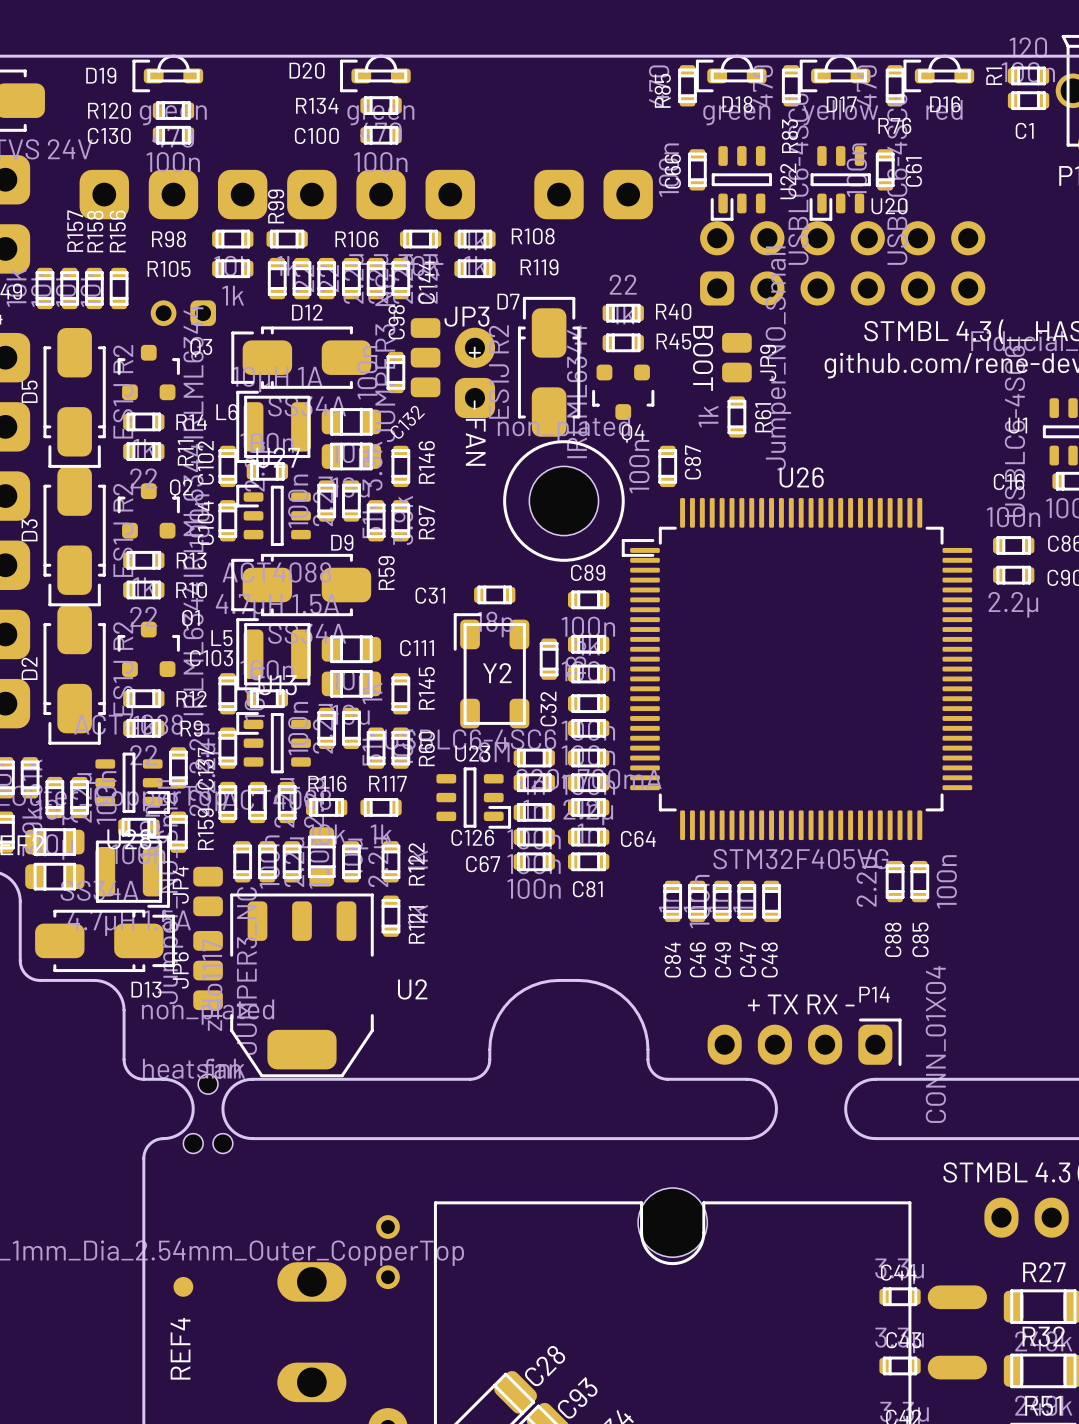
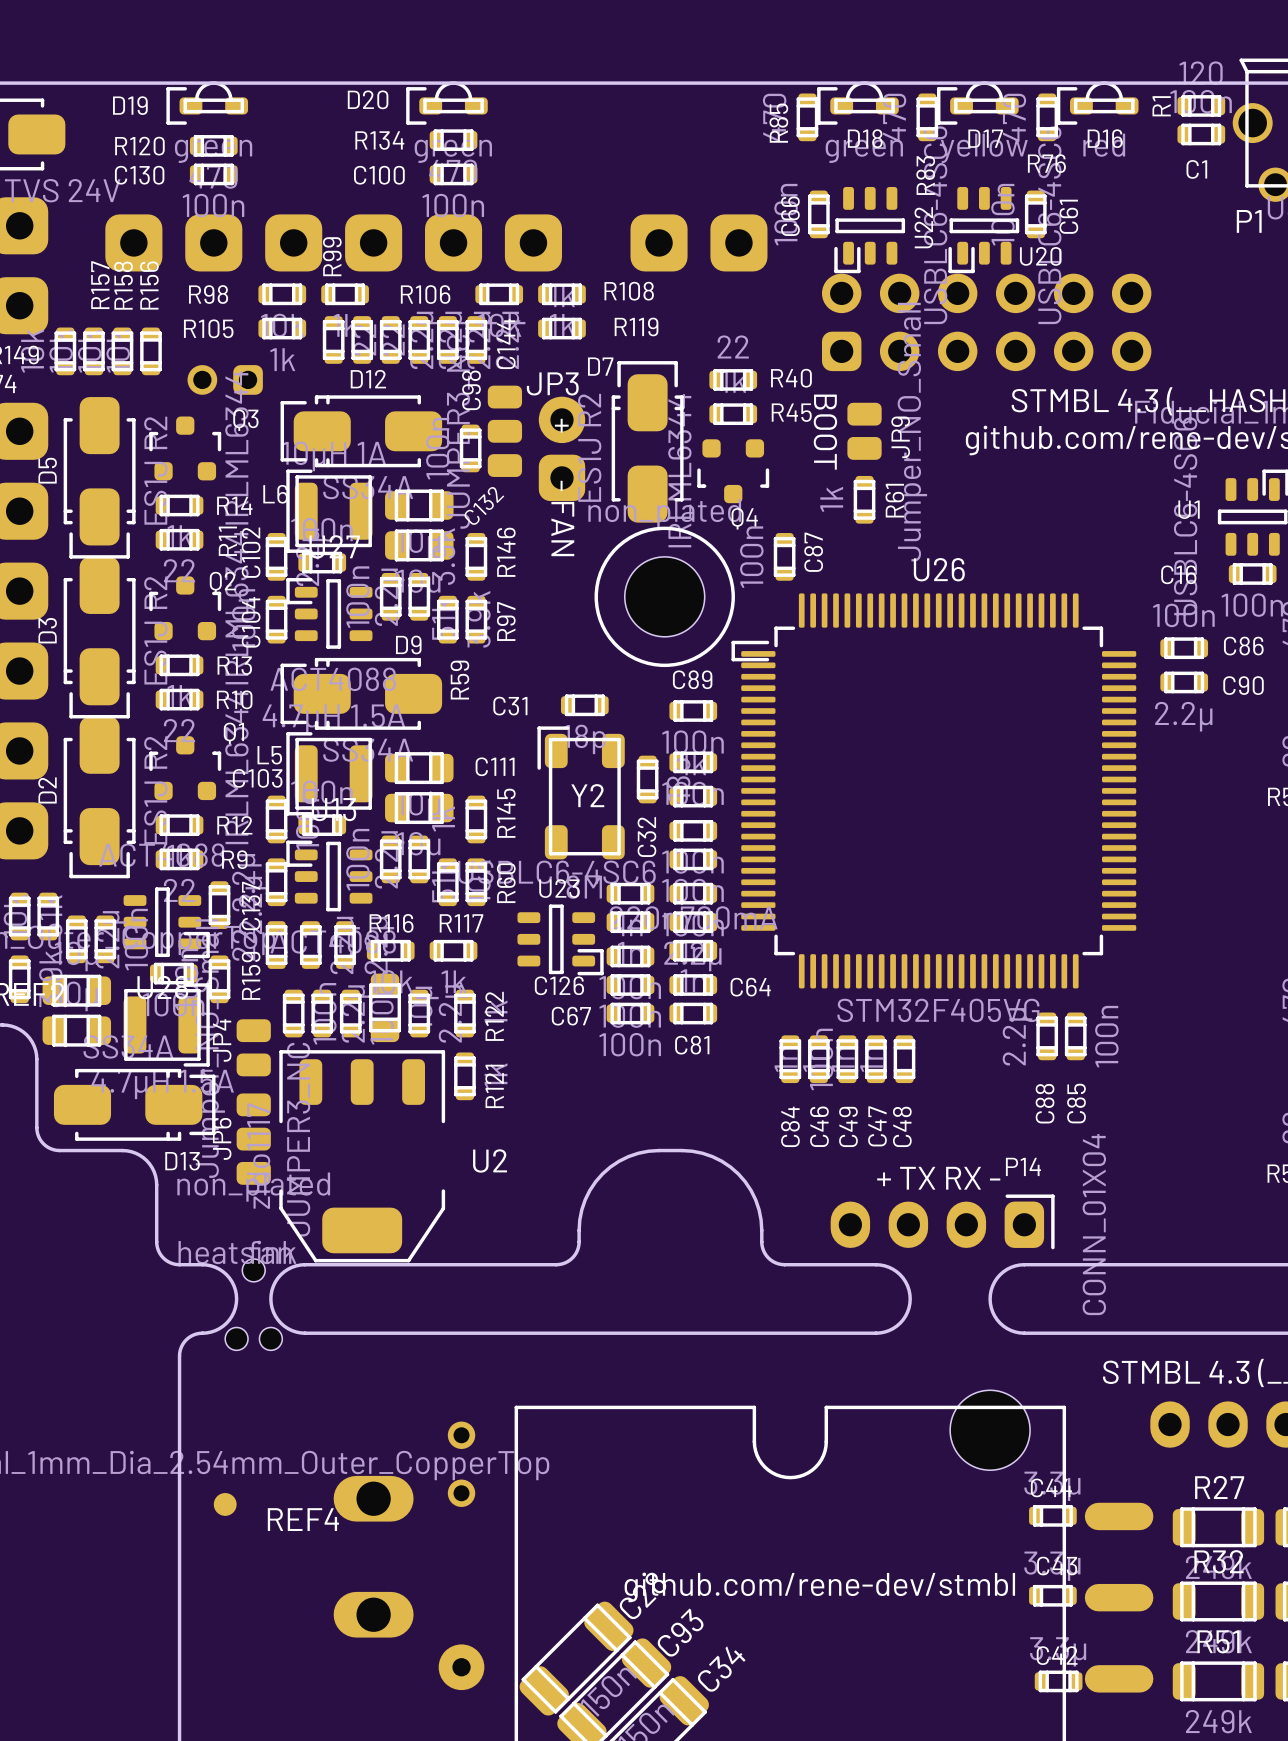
part position: (672, 1222) -> (990, 1430)
REF4 name rotation: 0° (180, 1348) -> 90° clockwise (303, 1519)
text: none -> github.com/rene-dev/stmbl (819, 1587)

